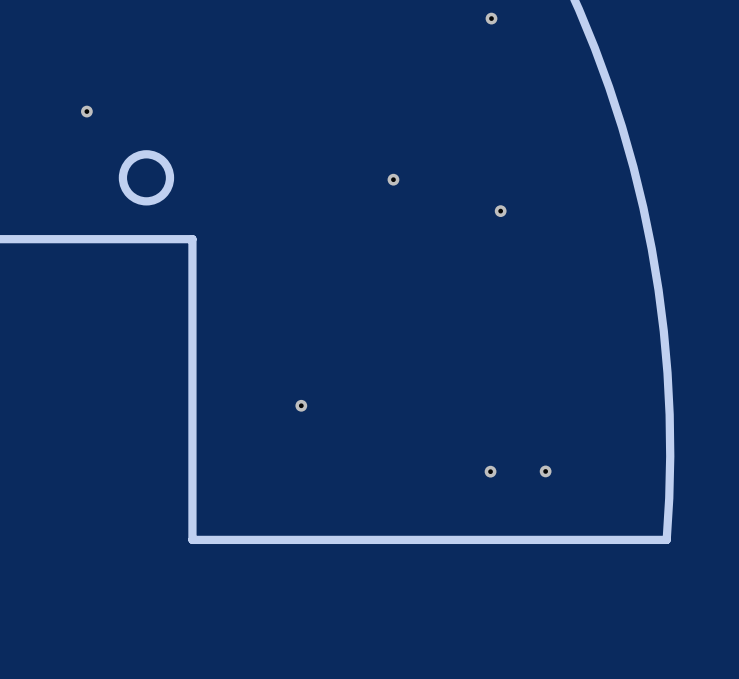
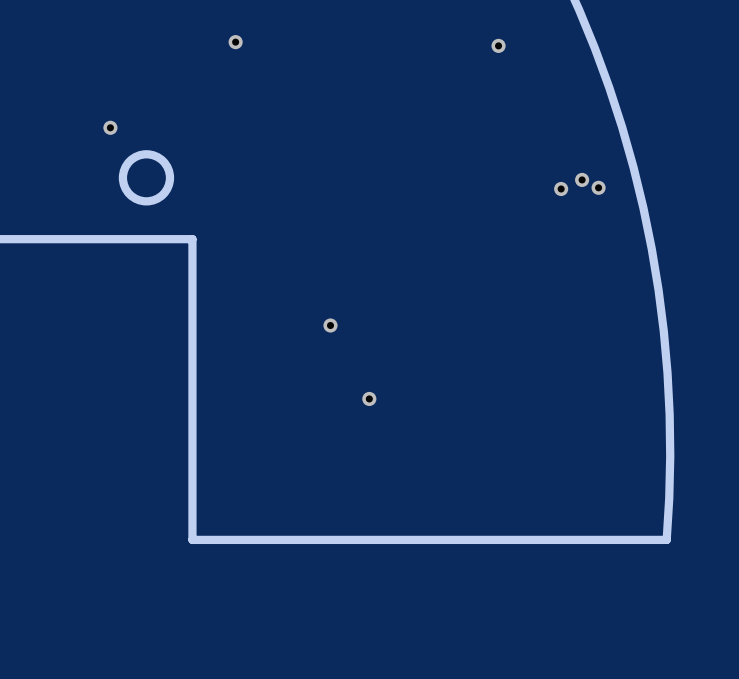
via: (491, 18) -> none
via: none -> (235, 42)
via: none -> (498, 45)
via: (86, 111) -> none
via: none -> (110, 127)
via: (393, 179) -> none
via: none -> (582, 179)
via: none -> (598, 187)
via: none -> (561, 188)
via: (500, 211) -> none
via: none -> (330, 325)
via: none -> (369, 398)
via: (301, 405) -> none
via: (490, 471) -> none
via: (545, 471) -> none

